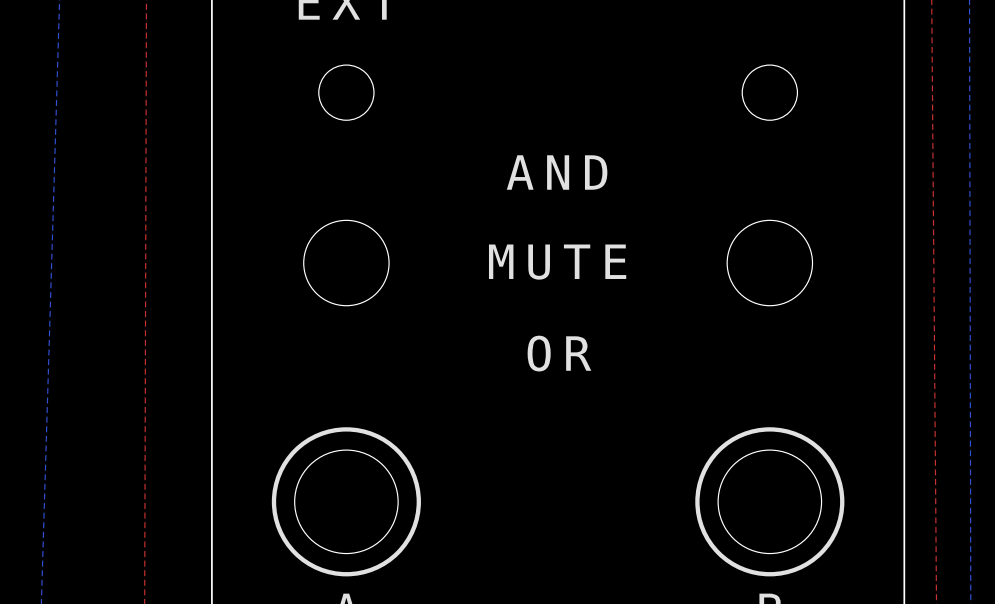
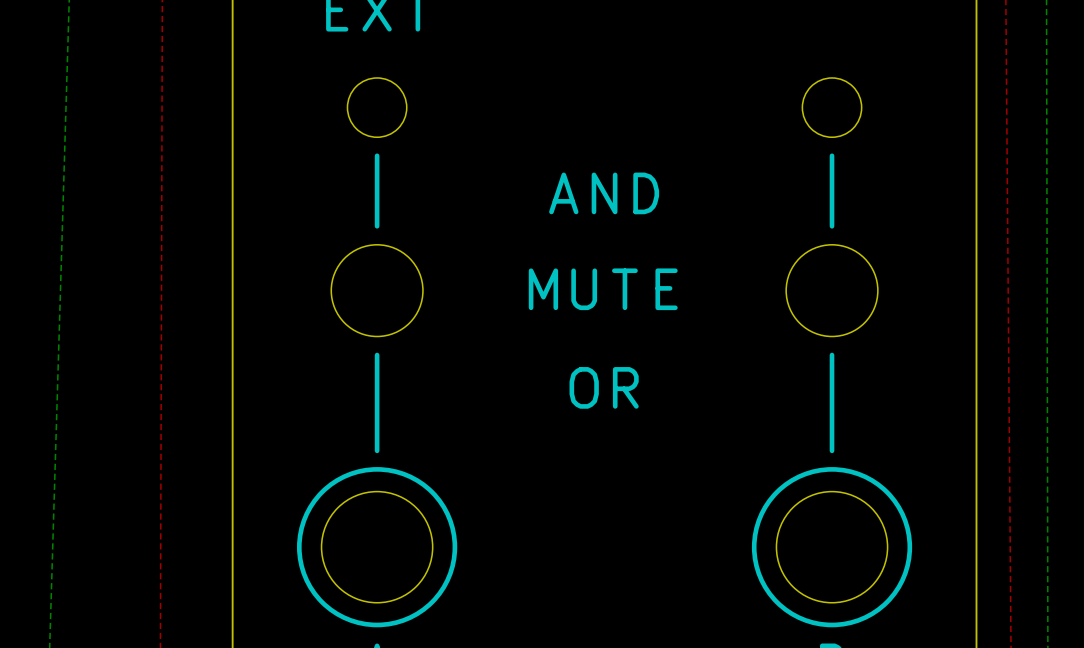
line: none -> (377, 155) (377, 226)
line: none -> (832, 155) (832, 226)
line: none -> (377, 355) (377, 450)
line: none -> (832, 355) (832, 450)

